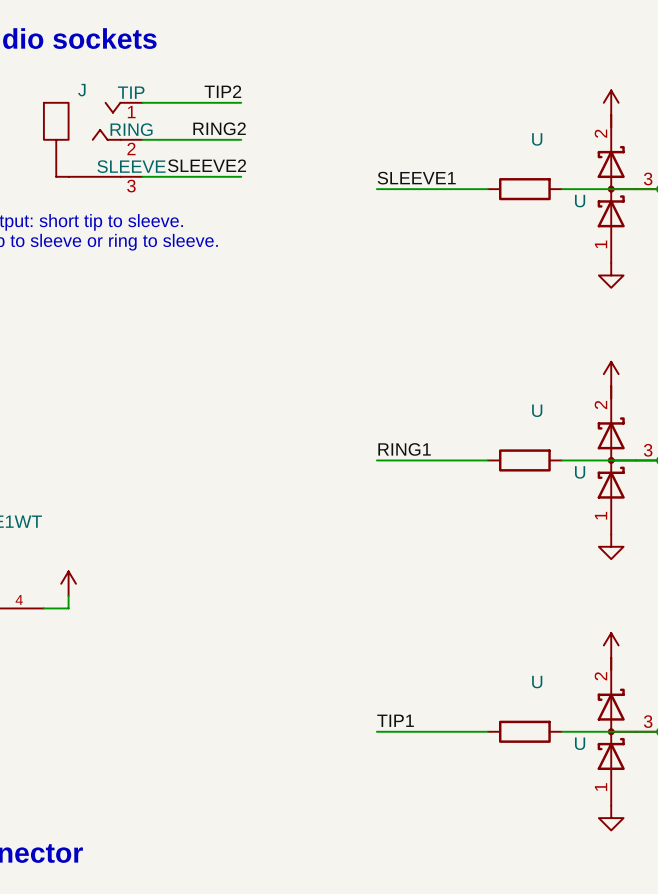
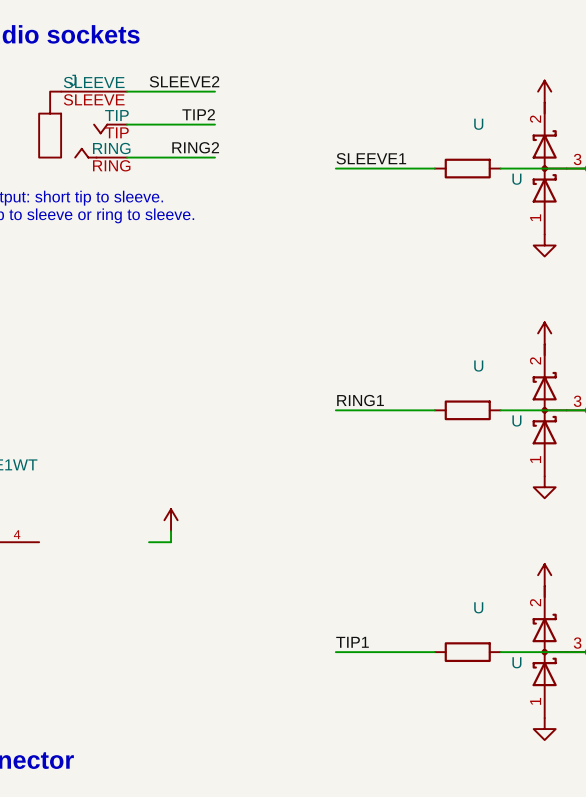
label position: TIP2 (222, 91) -> TIP2 (198, 114)
J symbol: [43, 102, 143, 177] -> [39, 91, 128, 158]
label position: RING2 (219, 128) -> RING2 (195, 147)
label position: SLEEVE2 (207, 165) -> SLEEVE2 (184, 81)
power symbol position: (68, 583) -> (171, 520)
wire: (68, 596) (68, 608) (43, 608) -> (171, 531) (171, 542) (149, 542)

